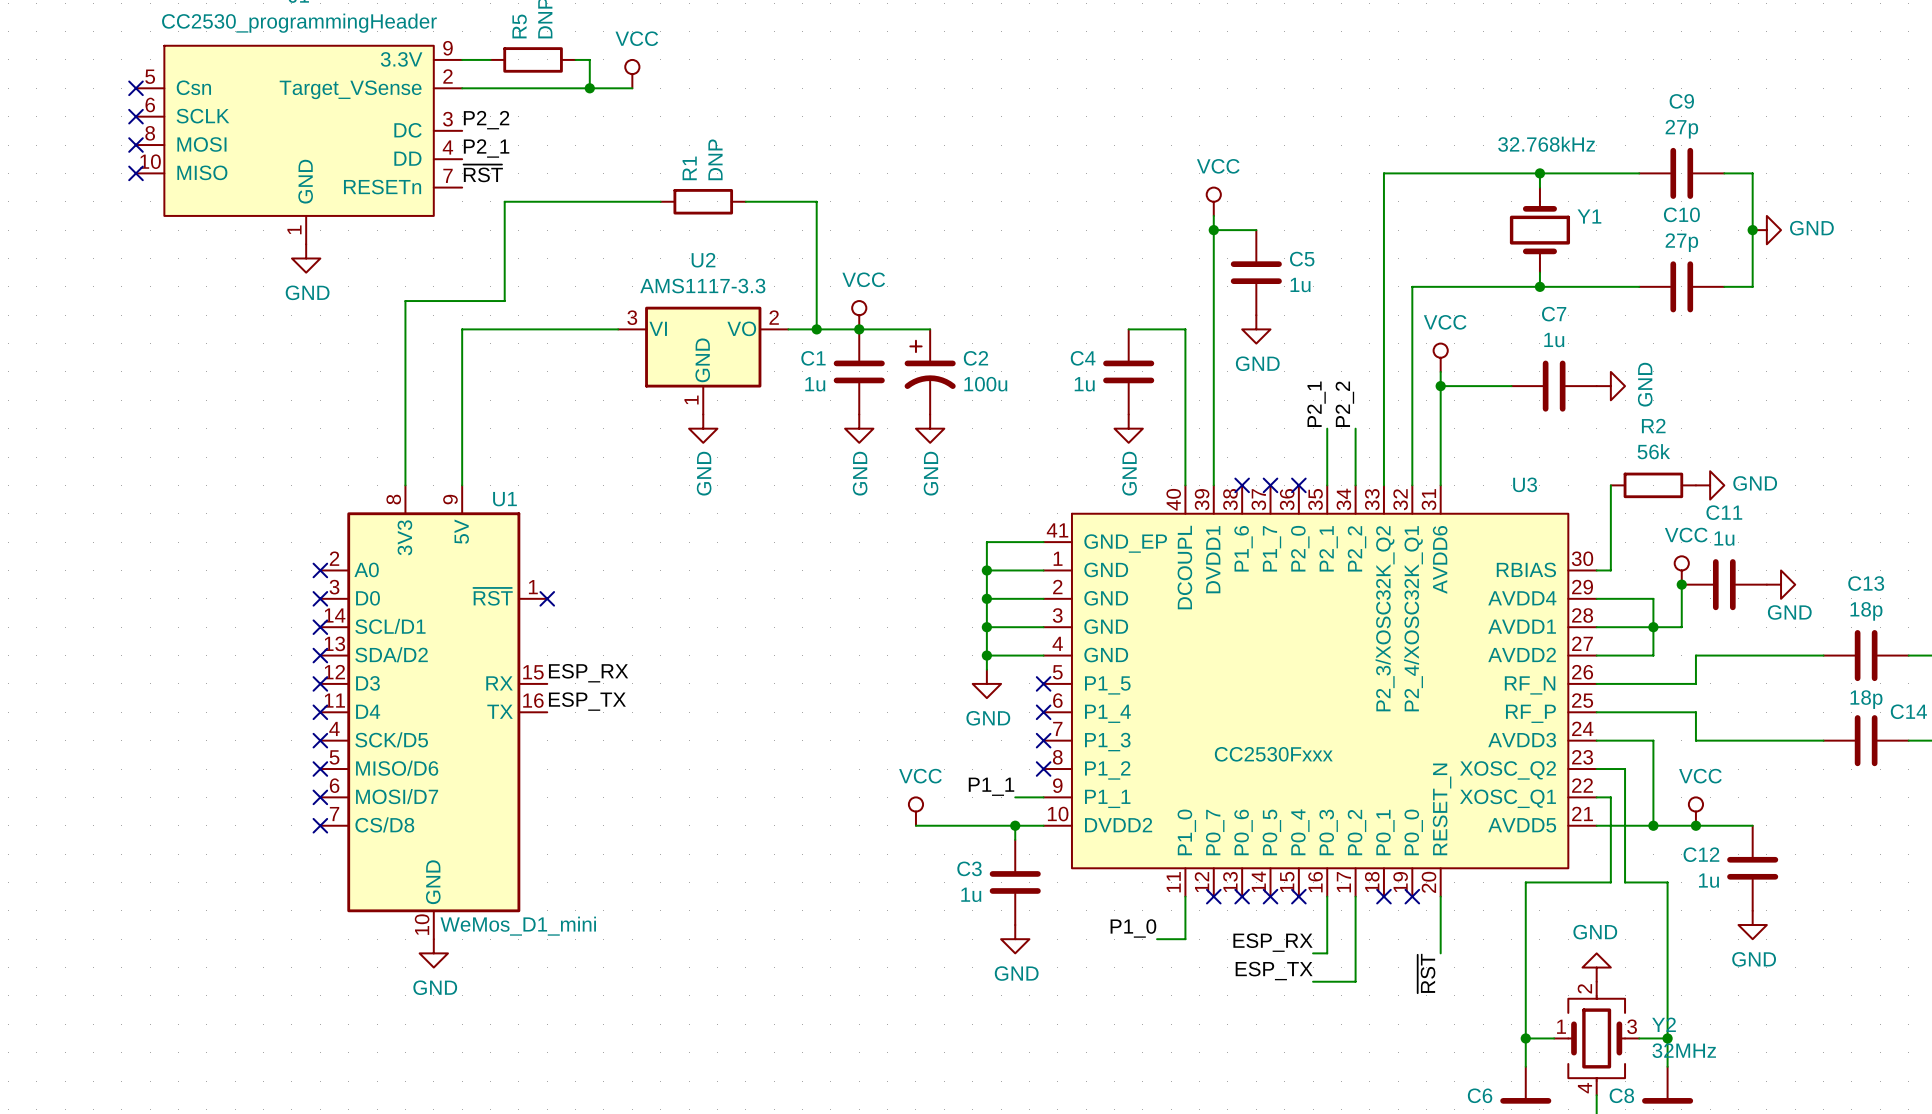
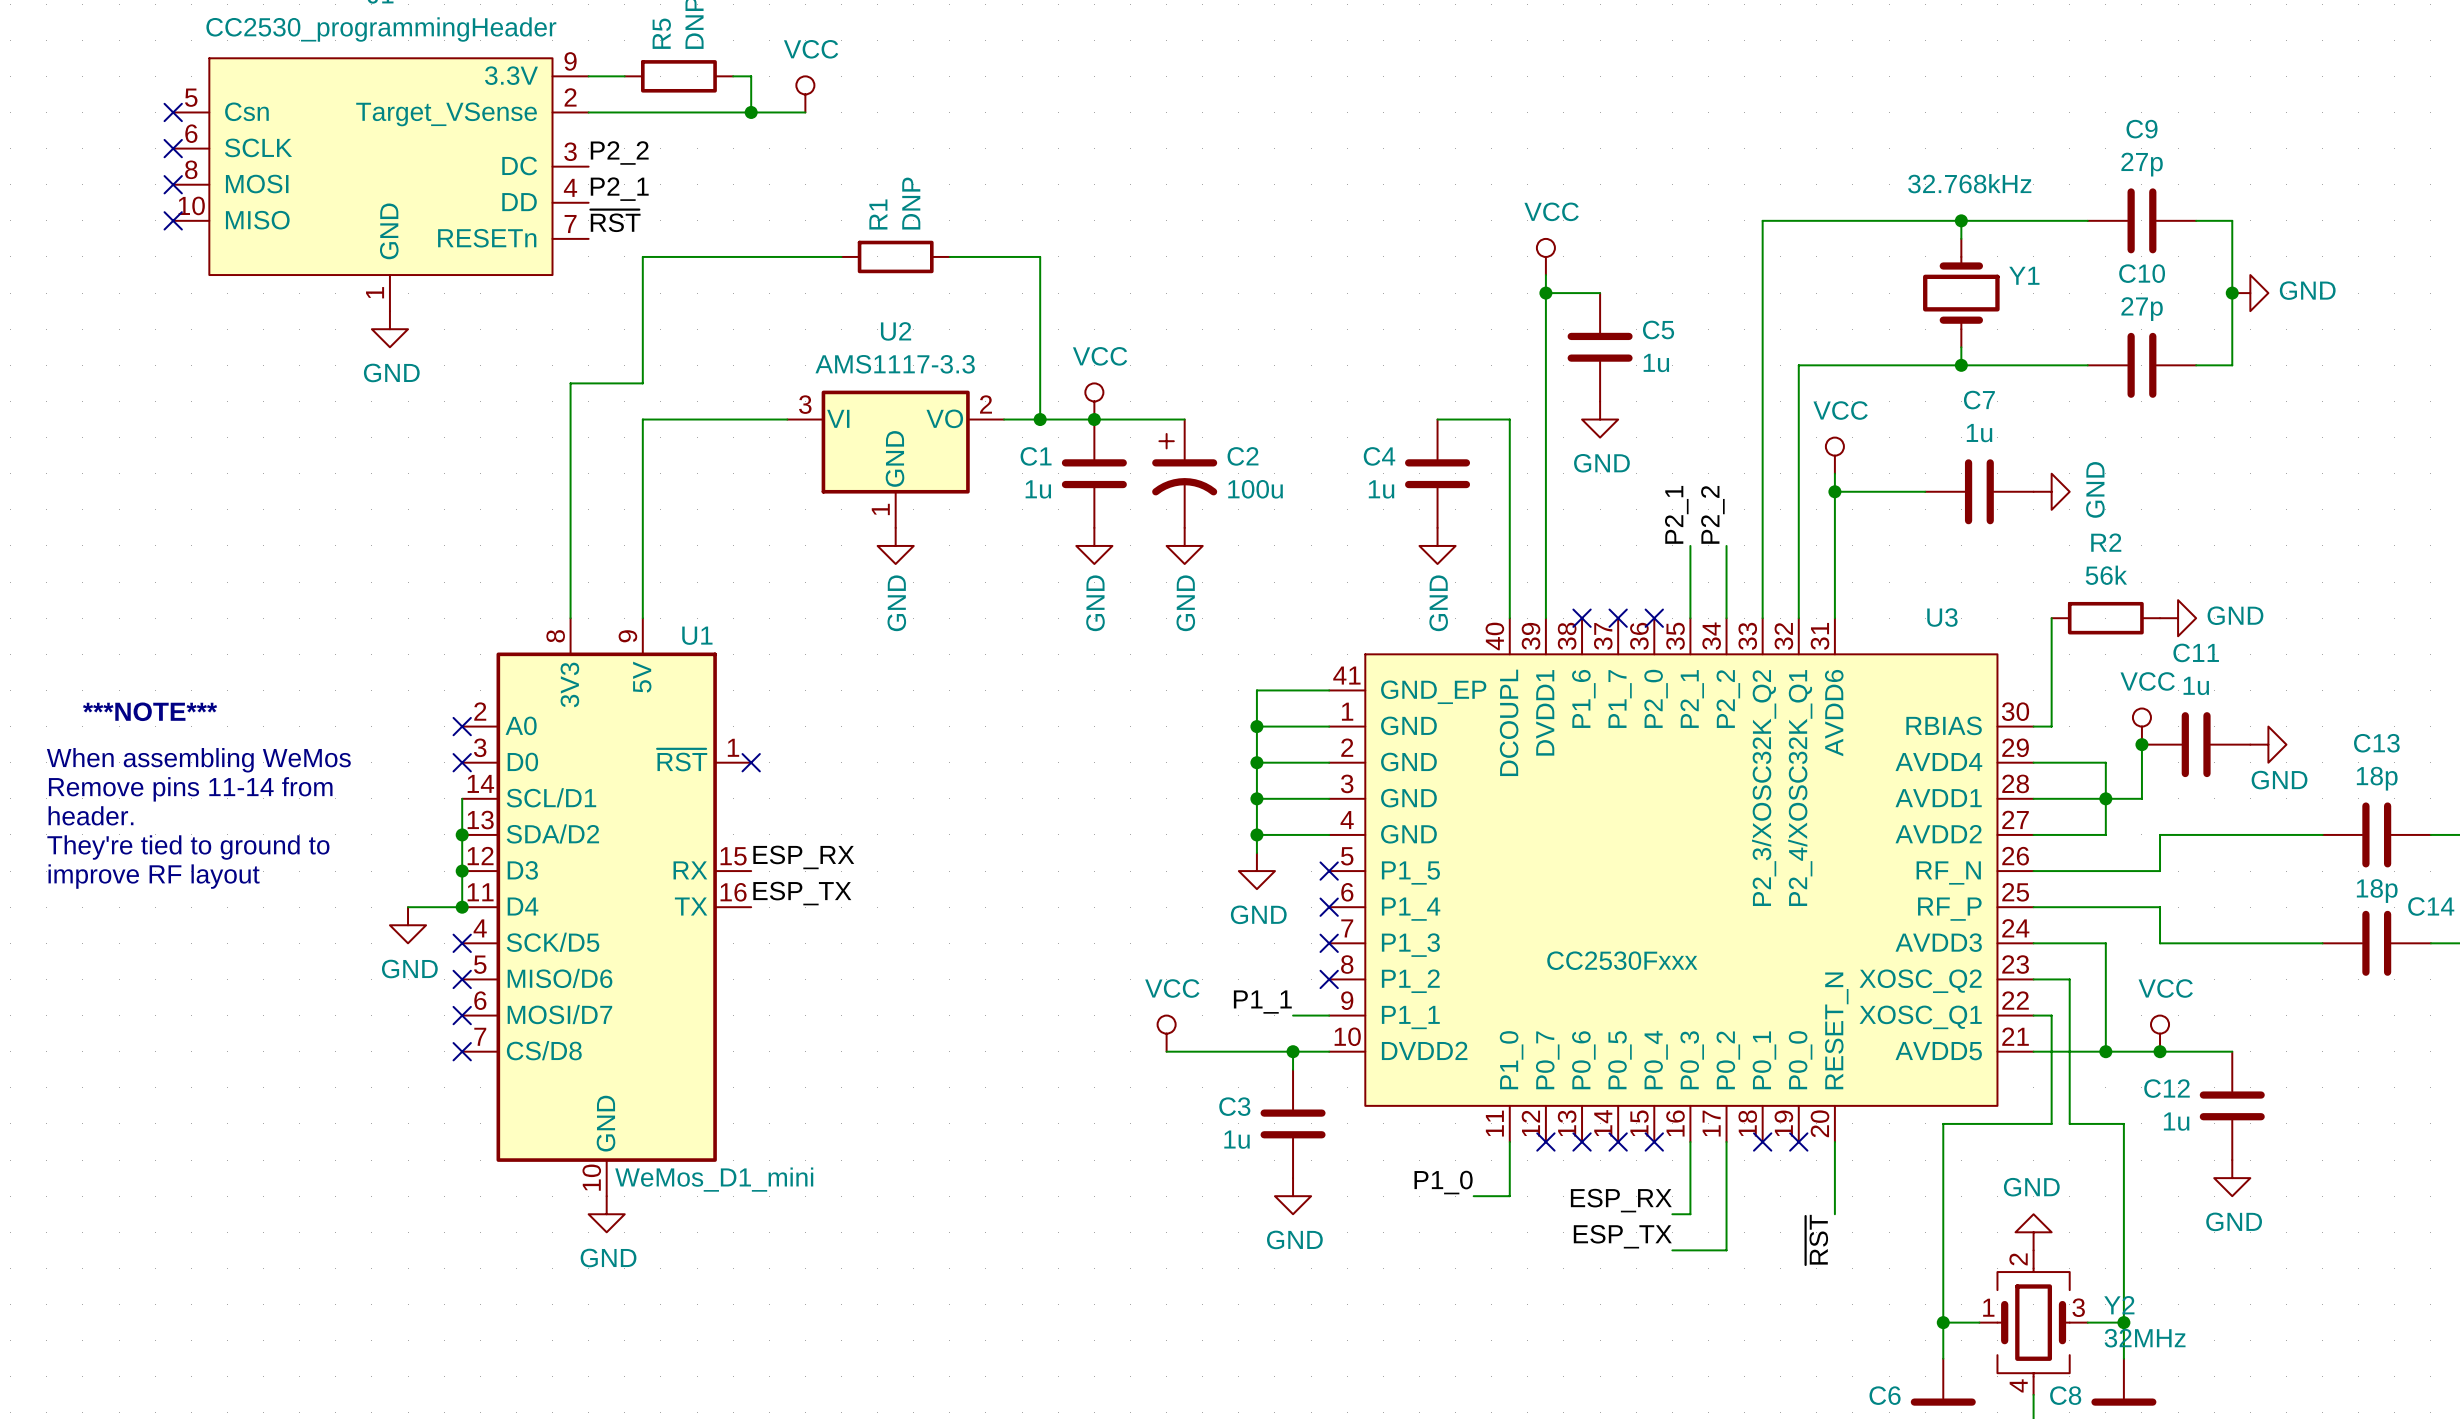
wire: (447, 301) (405, 301) (405, 485) -> (570, 383) (570, 618)
wire: (504, 329) (462, 329) (462, 485) -> (642, 419) (642, 618)
text: none -> ***NOTE*** (150, 711)
no-connect mark: (320, 570) -> none
no-connect mark: none -> (462, 726)
text: none -> When assembling WeMos (198, 760)
no-connect mark: (320, 598) -> none
no-connect mark: none -> (462, 762)
no-connect mark position: (547, 598) -> (751, 762)
text: none -> Remove pins 11-14 from (190, 789)
no-connect mark: (320, 627) -> none
text: none -> header. (91, 815)
no-connect mark: (320, 655) -> none
junction: none -> (462, 834)
text: none -> They're tied to ground to (188, 847)
label position: ESP_RX (588, 673) -> ESP_RX (803, 857)
no-connect mark: (320, 683) -> none
junction: none -> (462, 871)
text: none -> improve RF layout (154, 876)
label position: ESP_TX (587, 701) -> ESP_TX (802, 893)
no-connect mark: (320, 712) -> none
junction: none -> (462, 907)
U1 position: (433, 712) -> (606, 907)
power symbol: none -> GND (408, 925)
no-connect mark: (320, 740) -> none
no-connect mark: none -> (462, 943)
no-connect mark: (320, 769) -> none
no-connect mark: none -> (462, 979)
no-connect mark: (320, 797) -> none
no-connect mark: none -> (462, 1015)
no-connect mark: (320, 825) -> none
no-connect mark: none -> (462, 1051)
power symbol position: GND (433, 953) -> GND (606, 1214)

